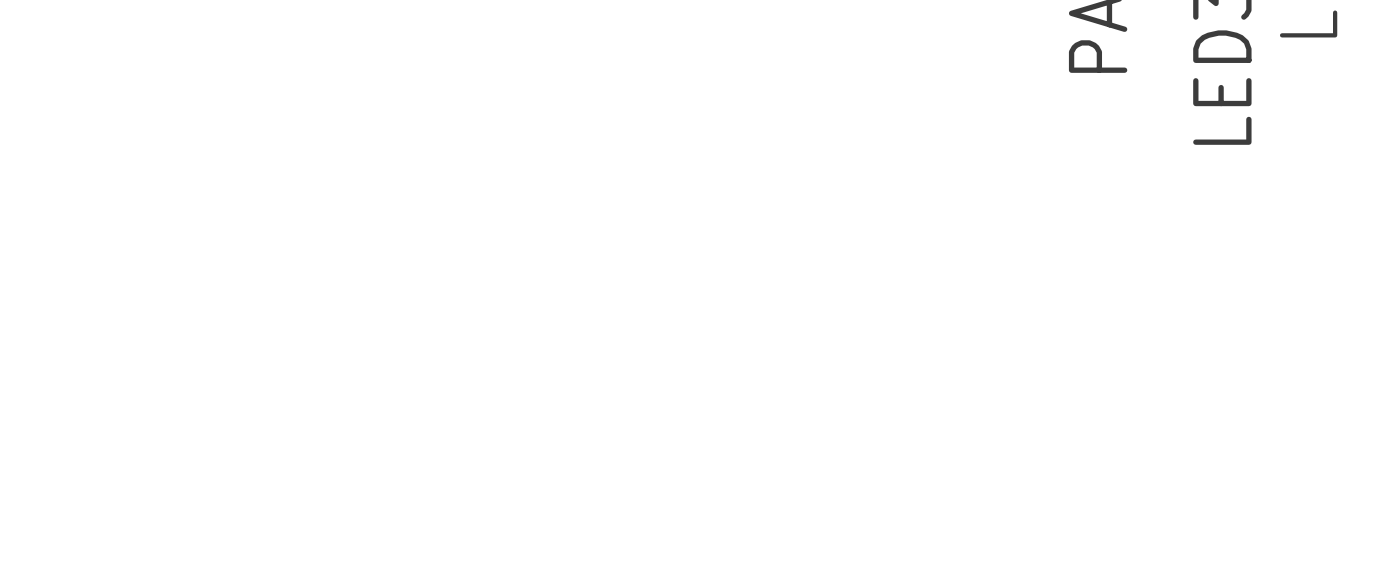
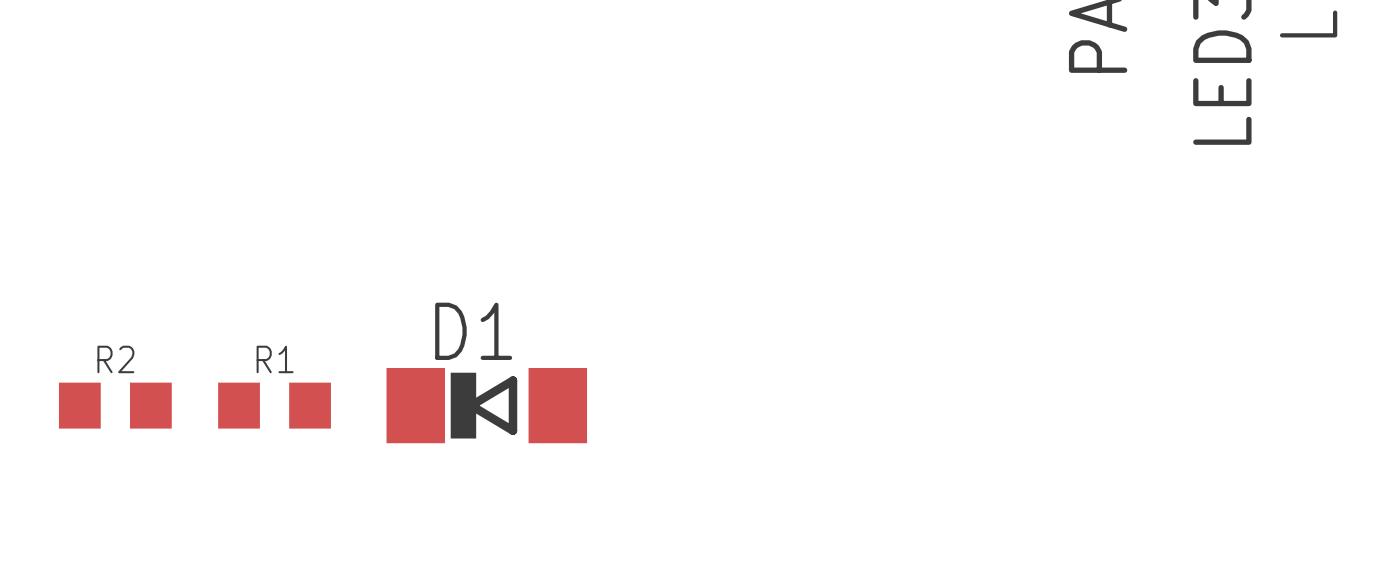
R2: none -> (115, 405)
R1: none -> (274, 405)
D1: none -> (486, 405)

